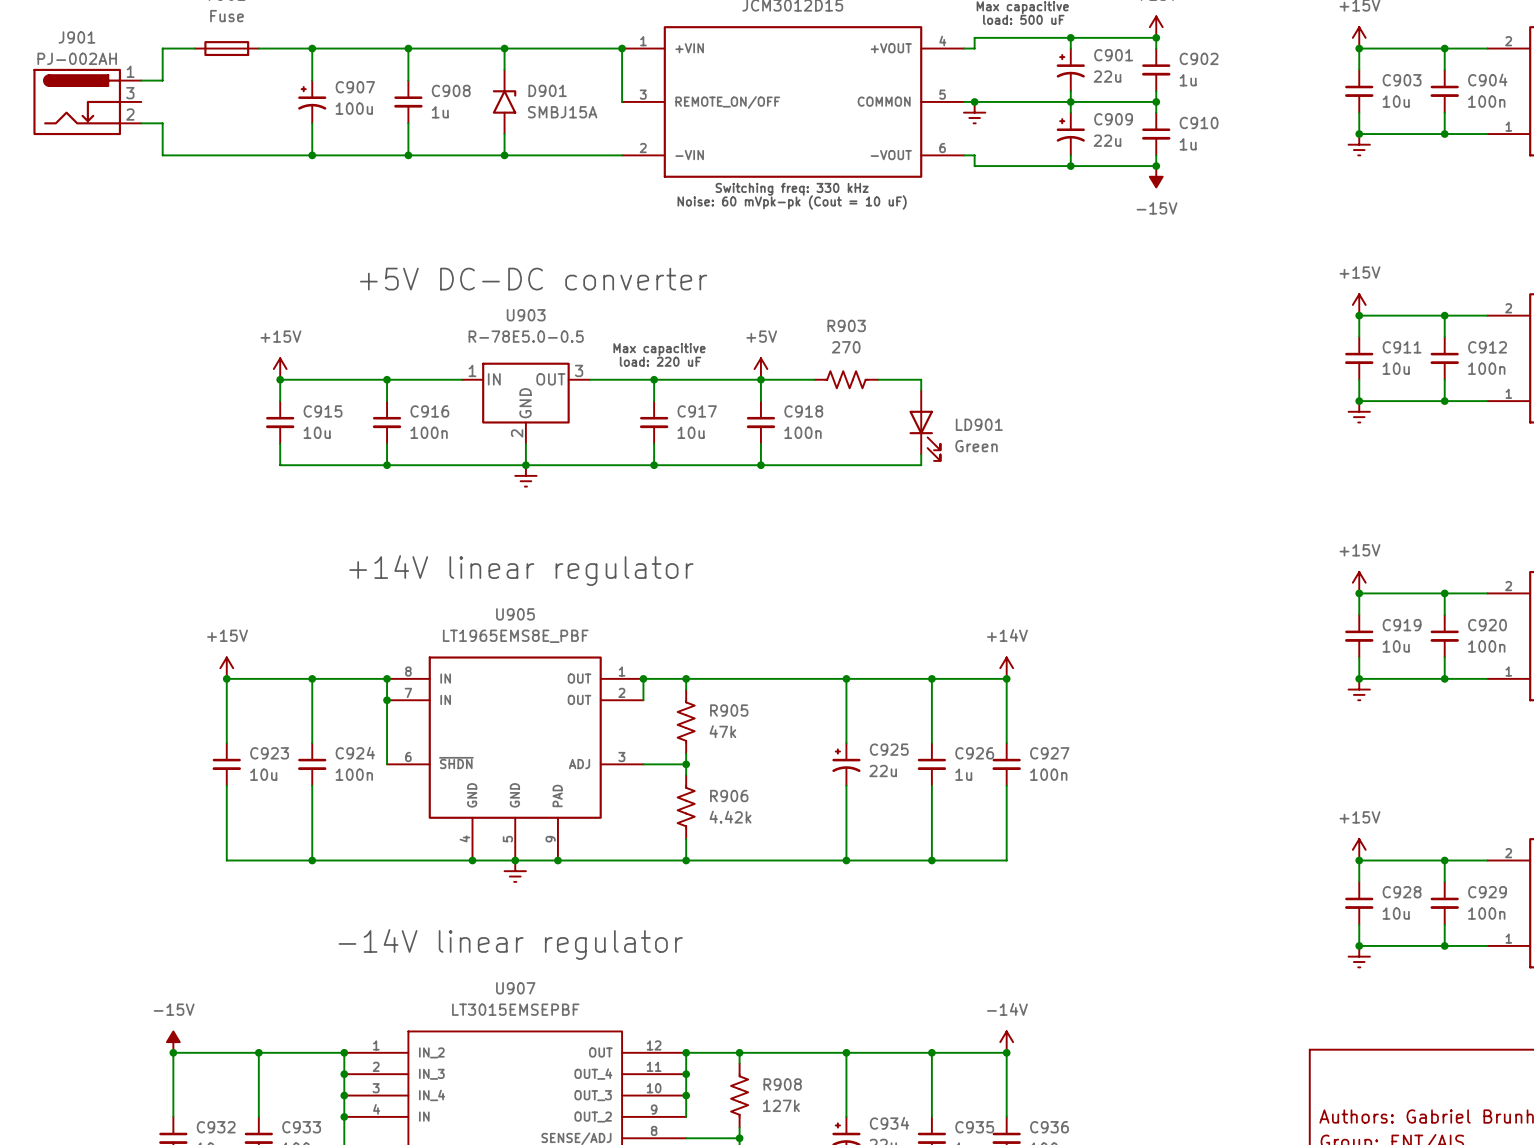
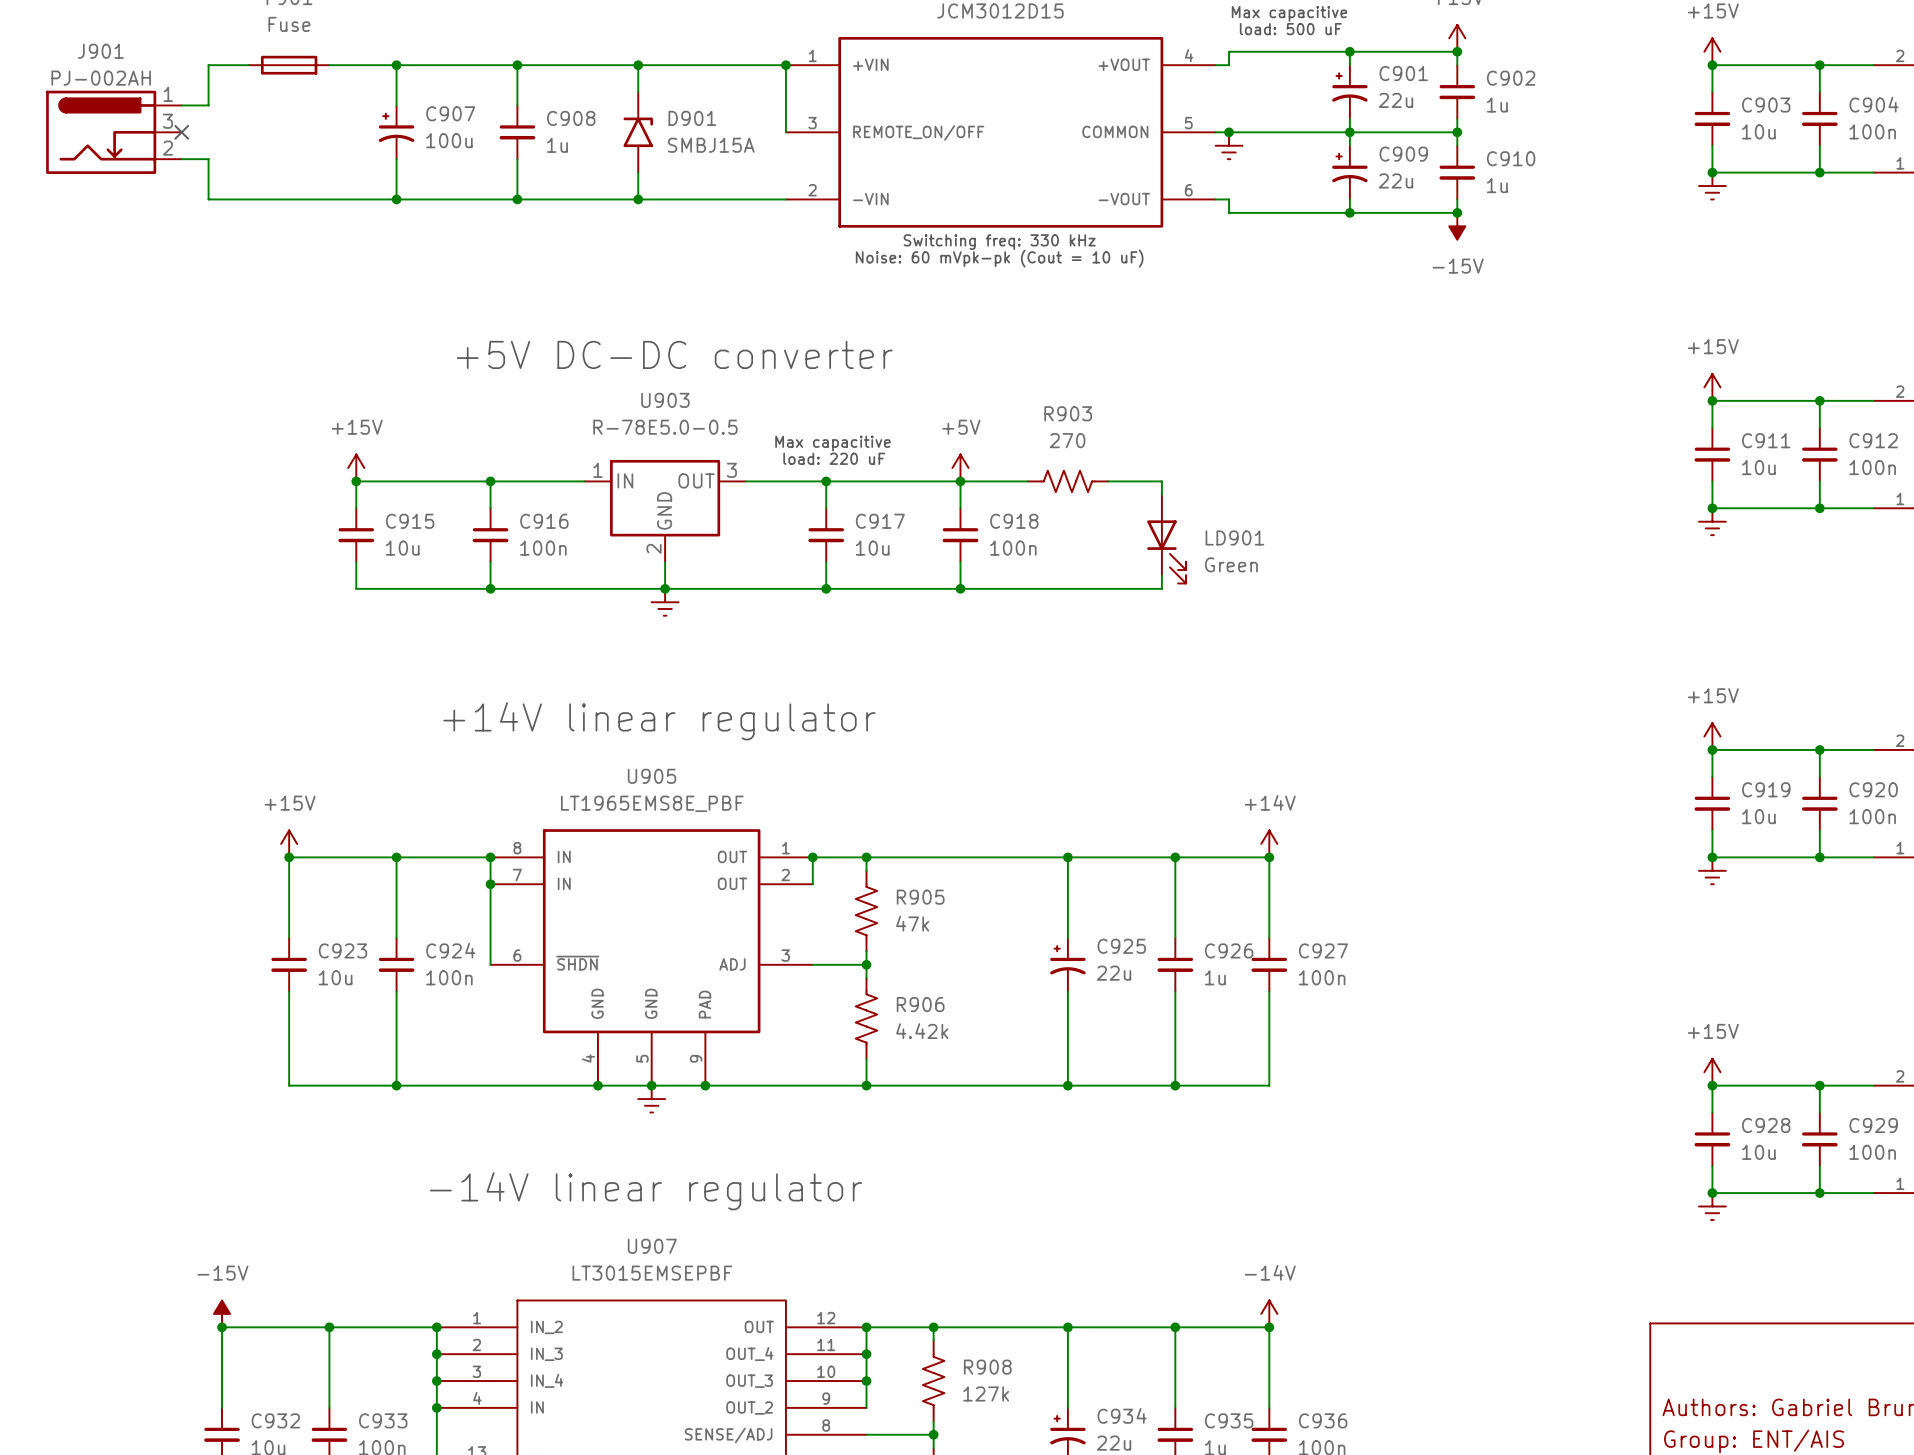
no-connect mark: none -> (181, 132)

